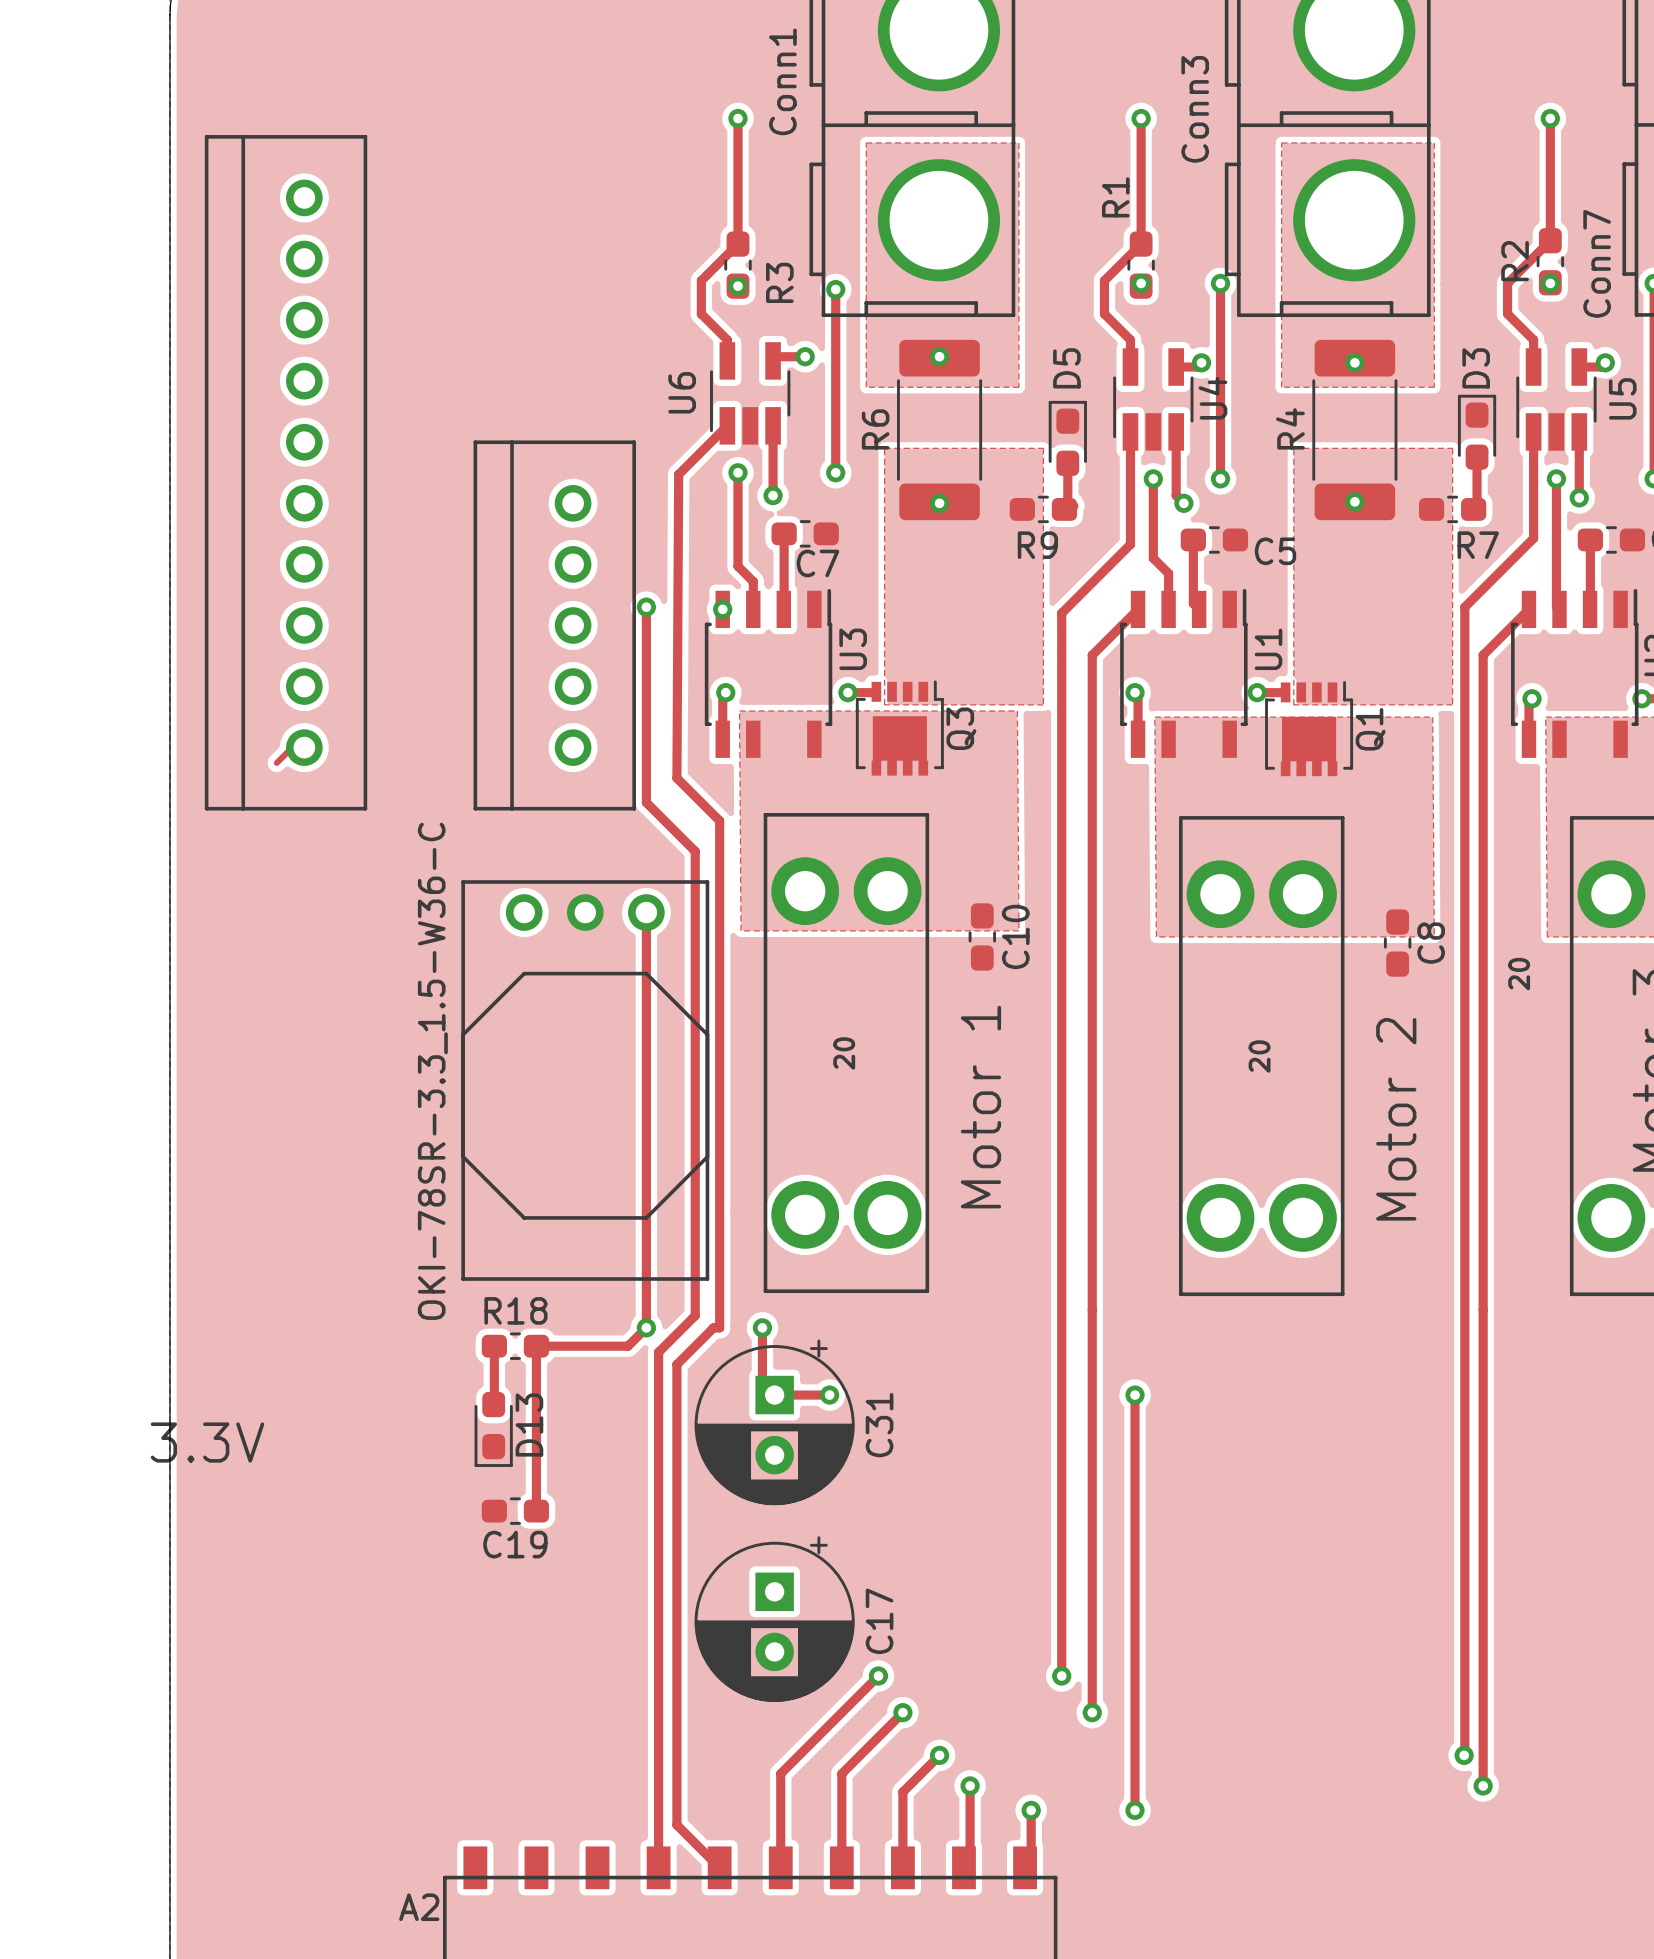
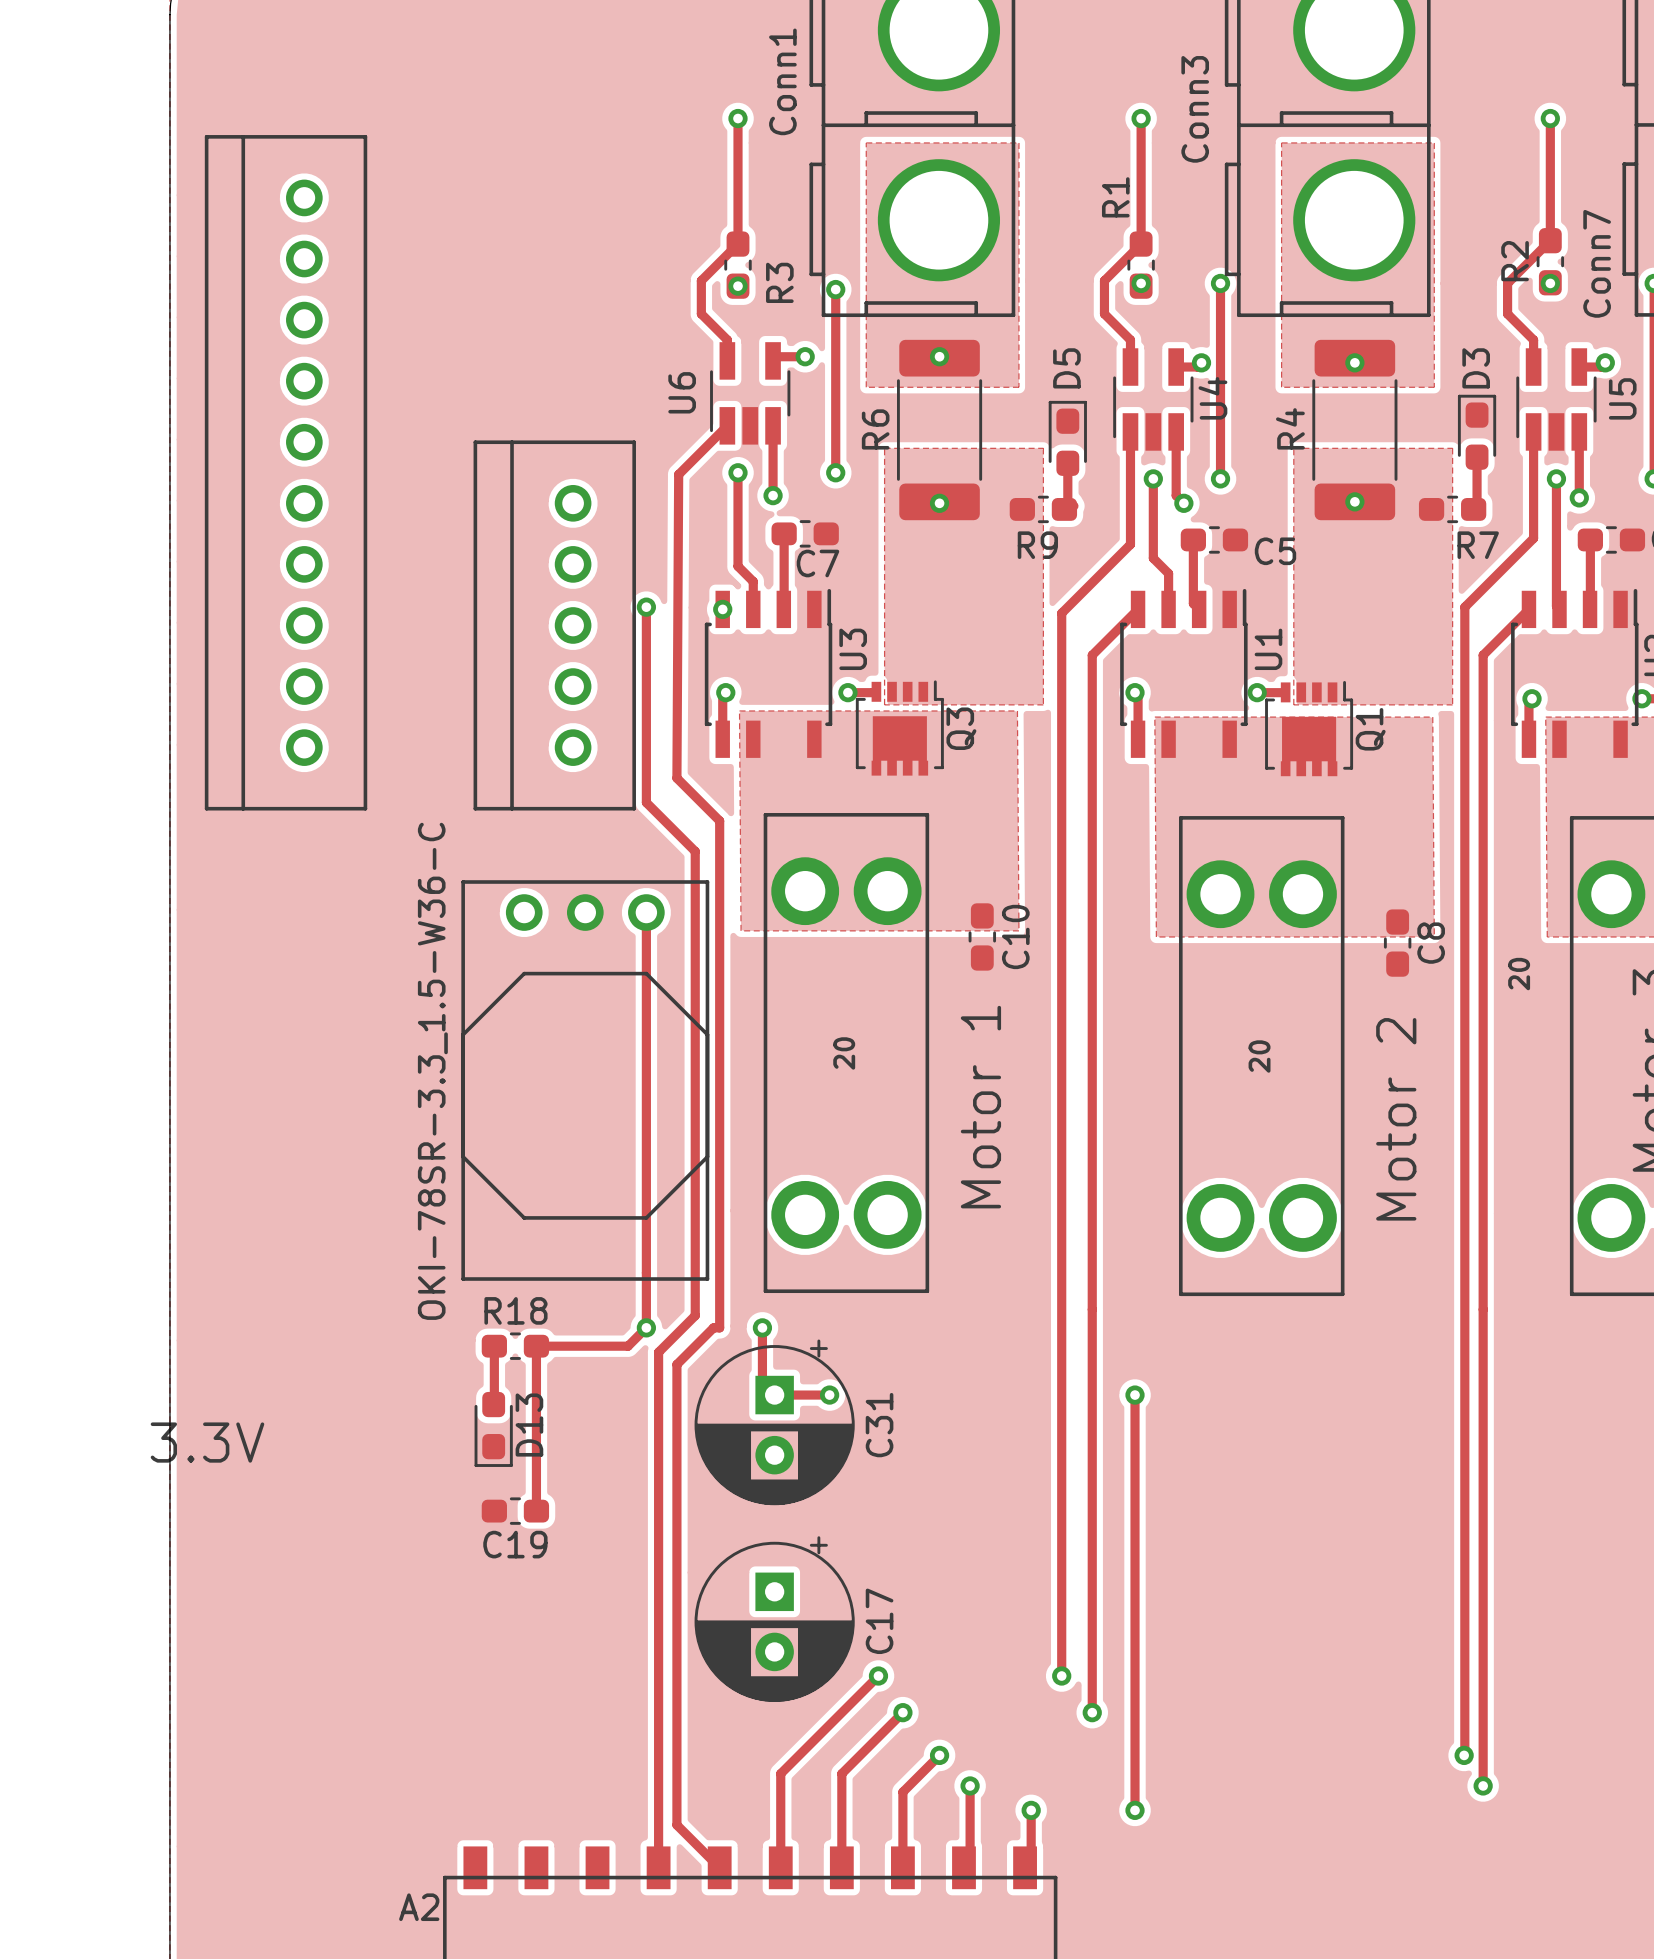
track: (292, 747) (276, 762) -> none

